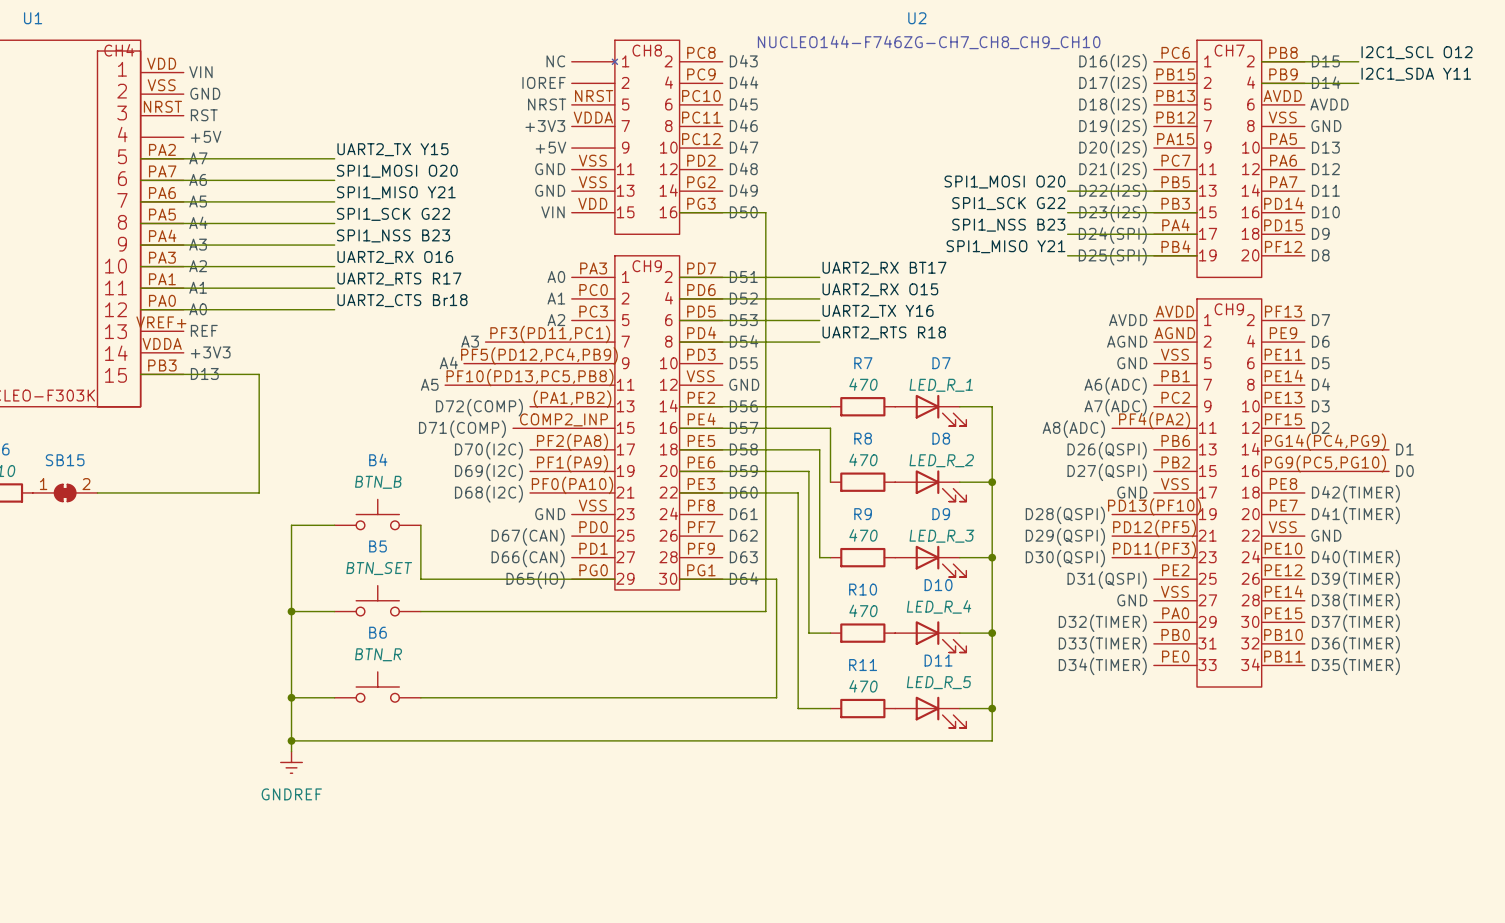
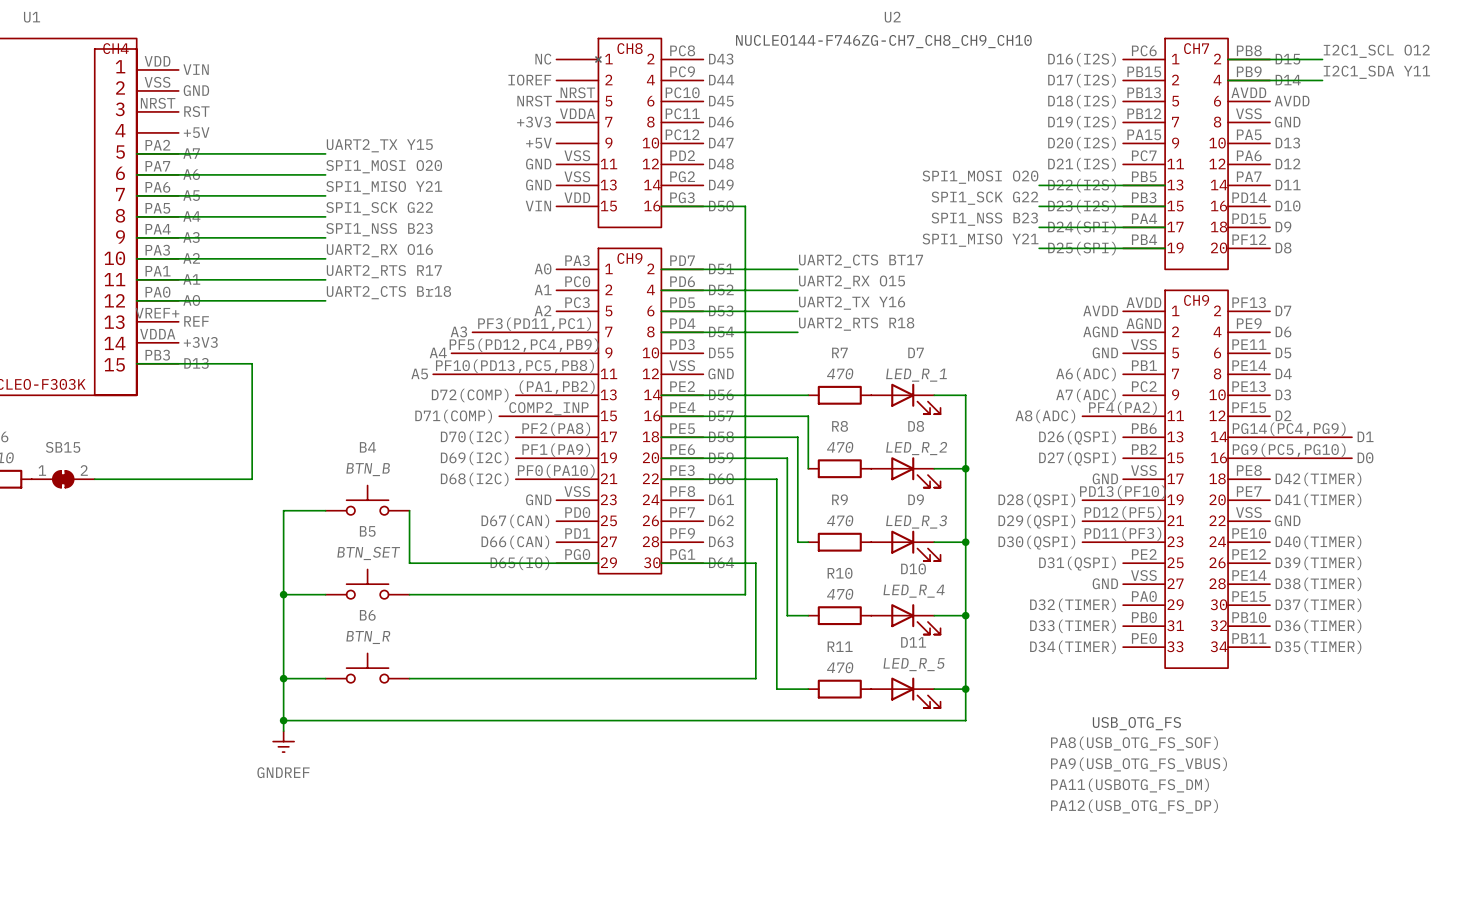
label: UART2_RX BT17 (884, 268) -> UART2_CTS BT17 (861, 261)
text: none -> USB_OTG_FS (1136, 723)
label: none -> PA8(USB_OTG_FS_SOF) (1134, 743)
label: none -> PA9(USB_OTG_FS_VBUS) (1139, 764)
label: none -> PA11(USBOTG_FS_DM) (1129, 785)
label: none -> PA12(USB_OTG_FS_DP) (1134, 806)

